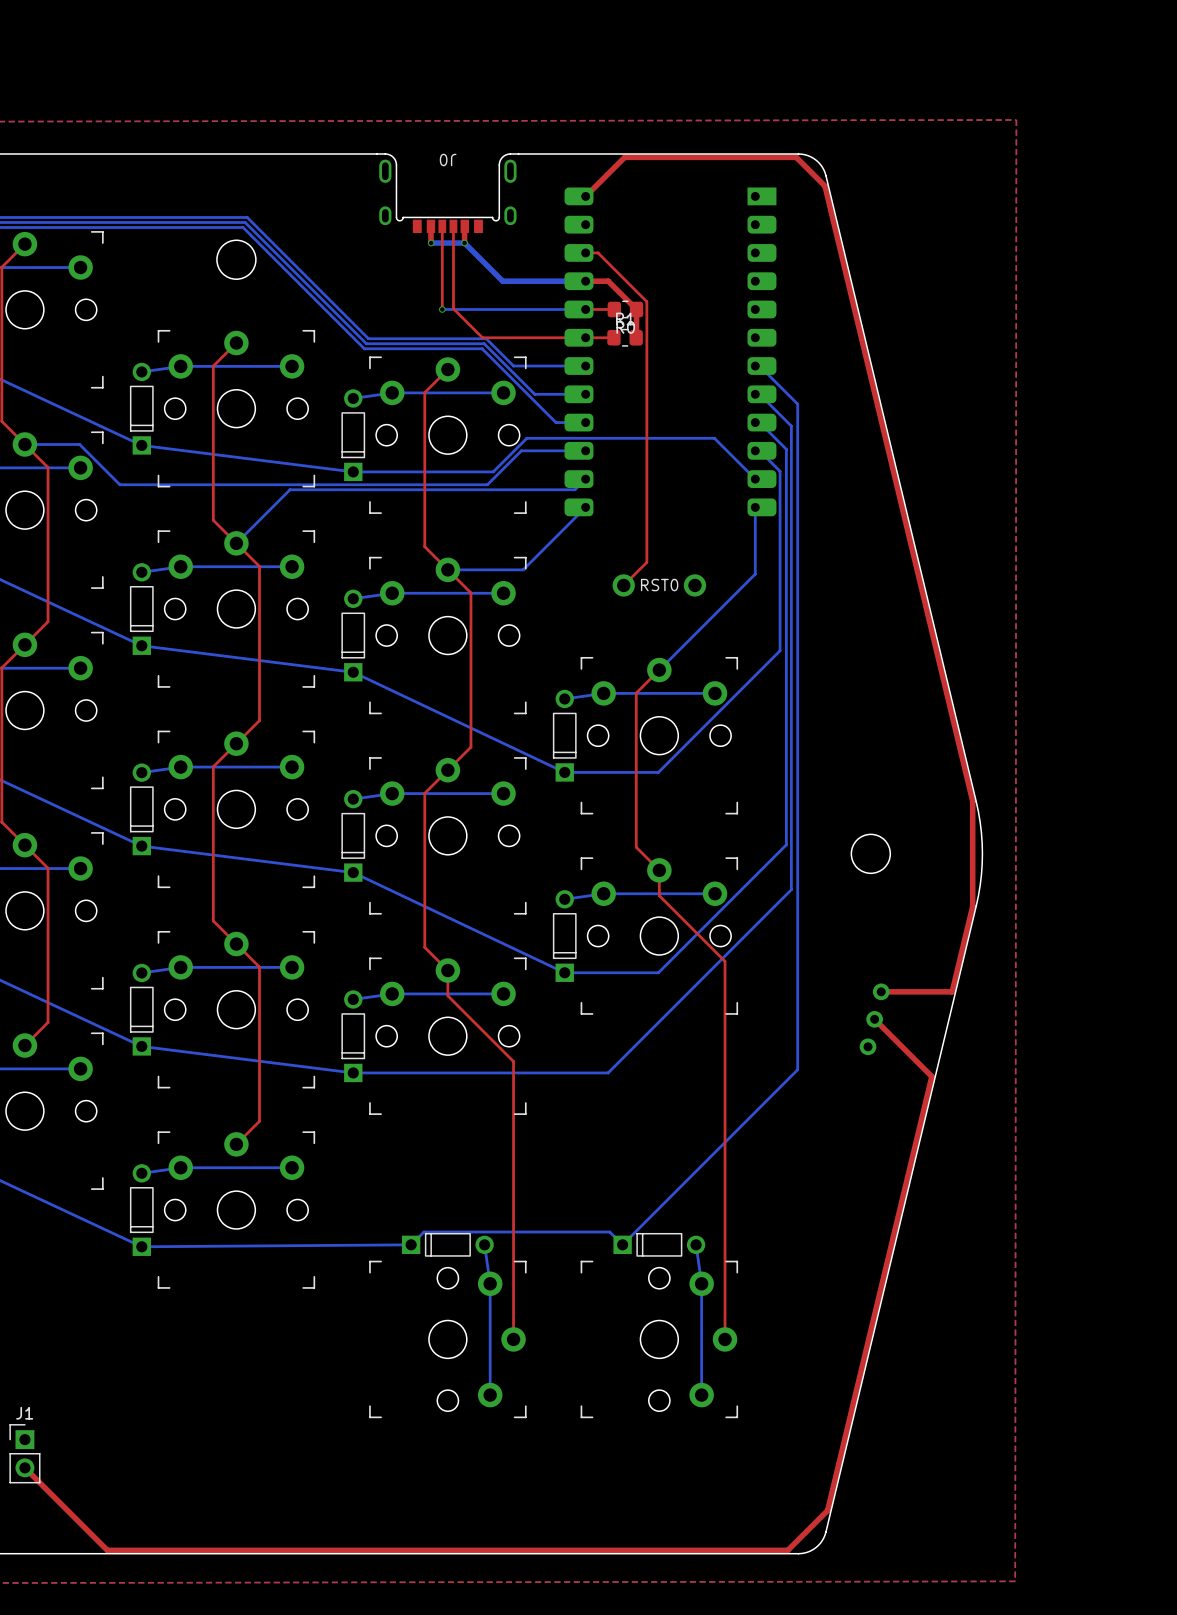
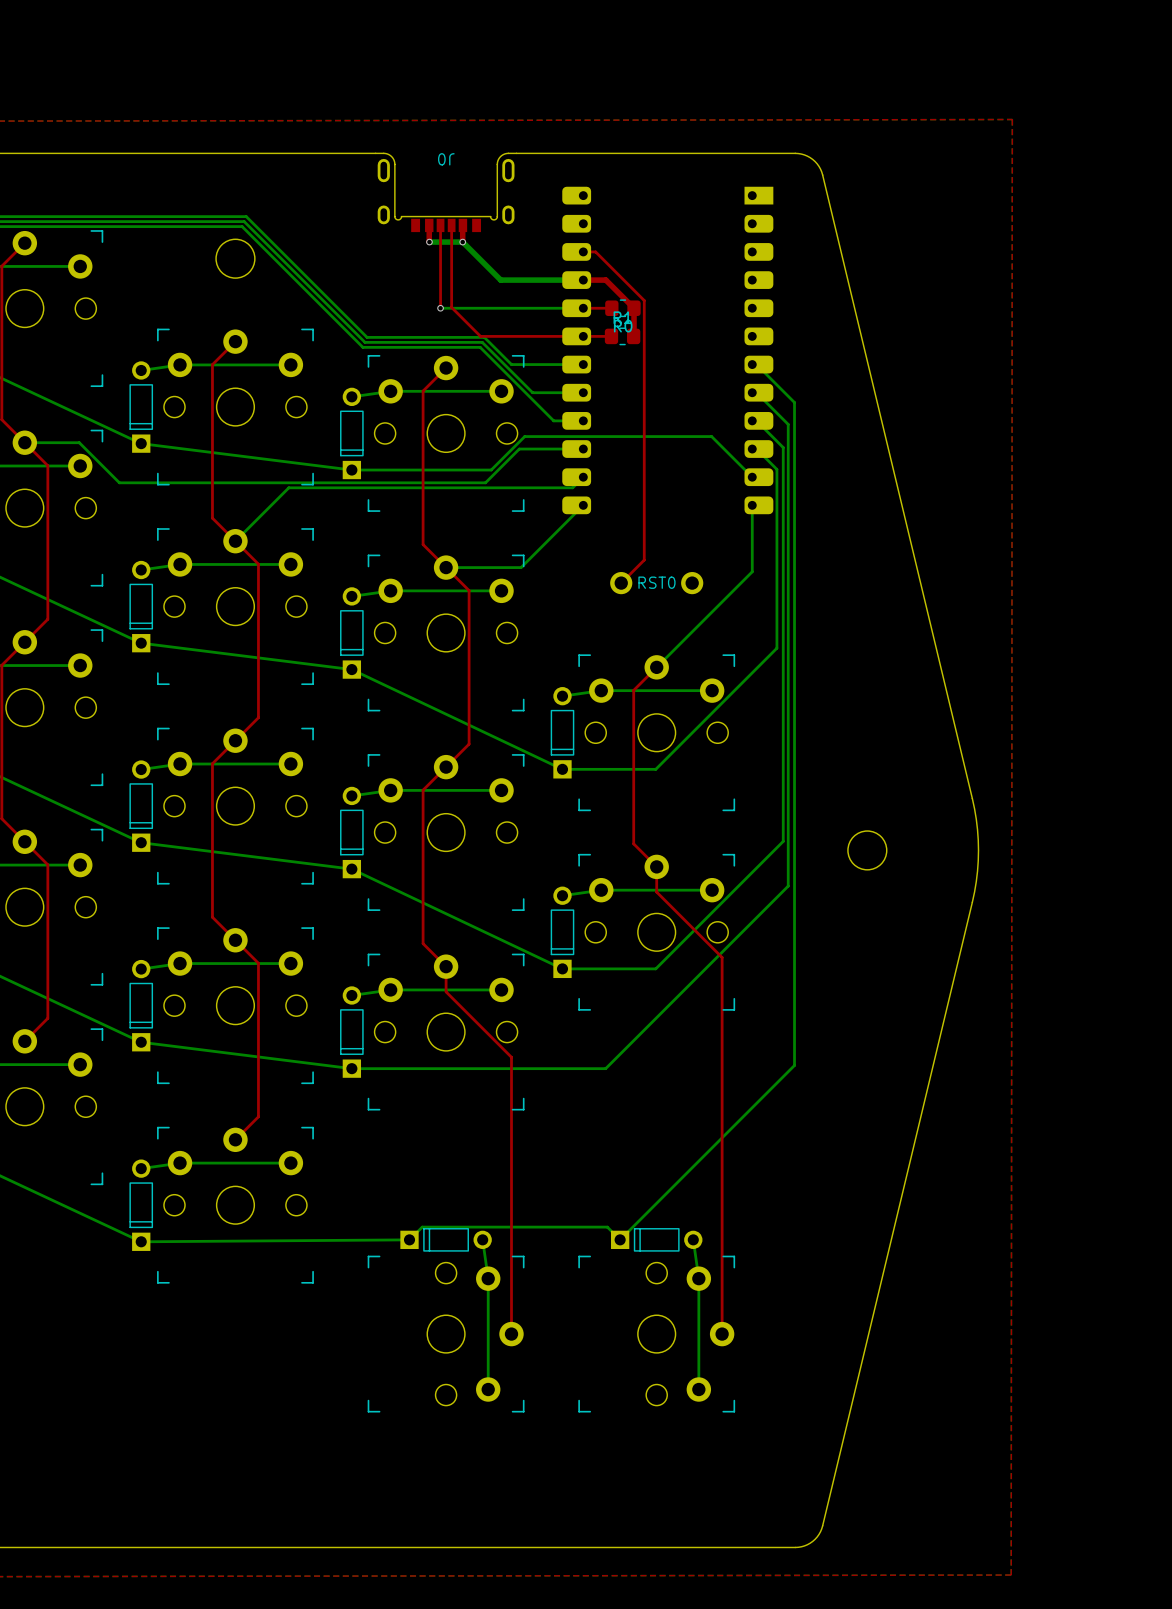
top track: (585, 196) (624, 157) (796, 157) (825, 186) (972, 801) (972, 906) (952, 991) (881, 991) -> none
top track: (874, 1019) (931, 1076) (827, 1510) (787, 1550) (107, 1550) (24, 1467) -> none
part: (874, 1019) -> none
J1: (24, 1453) -> none

